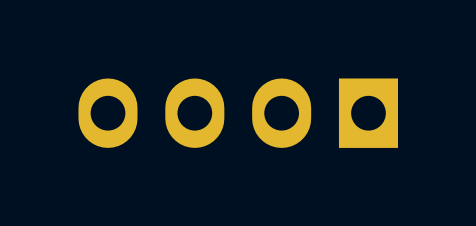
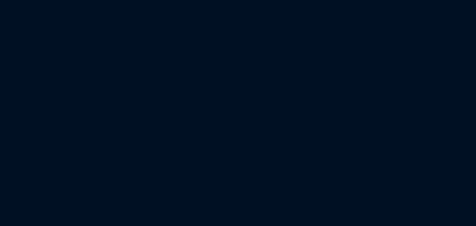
part: (238, 113) -> none

